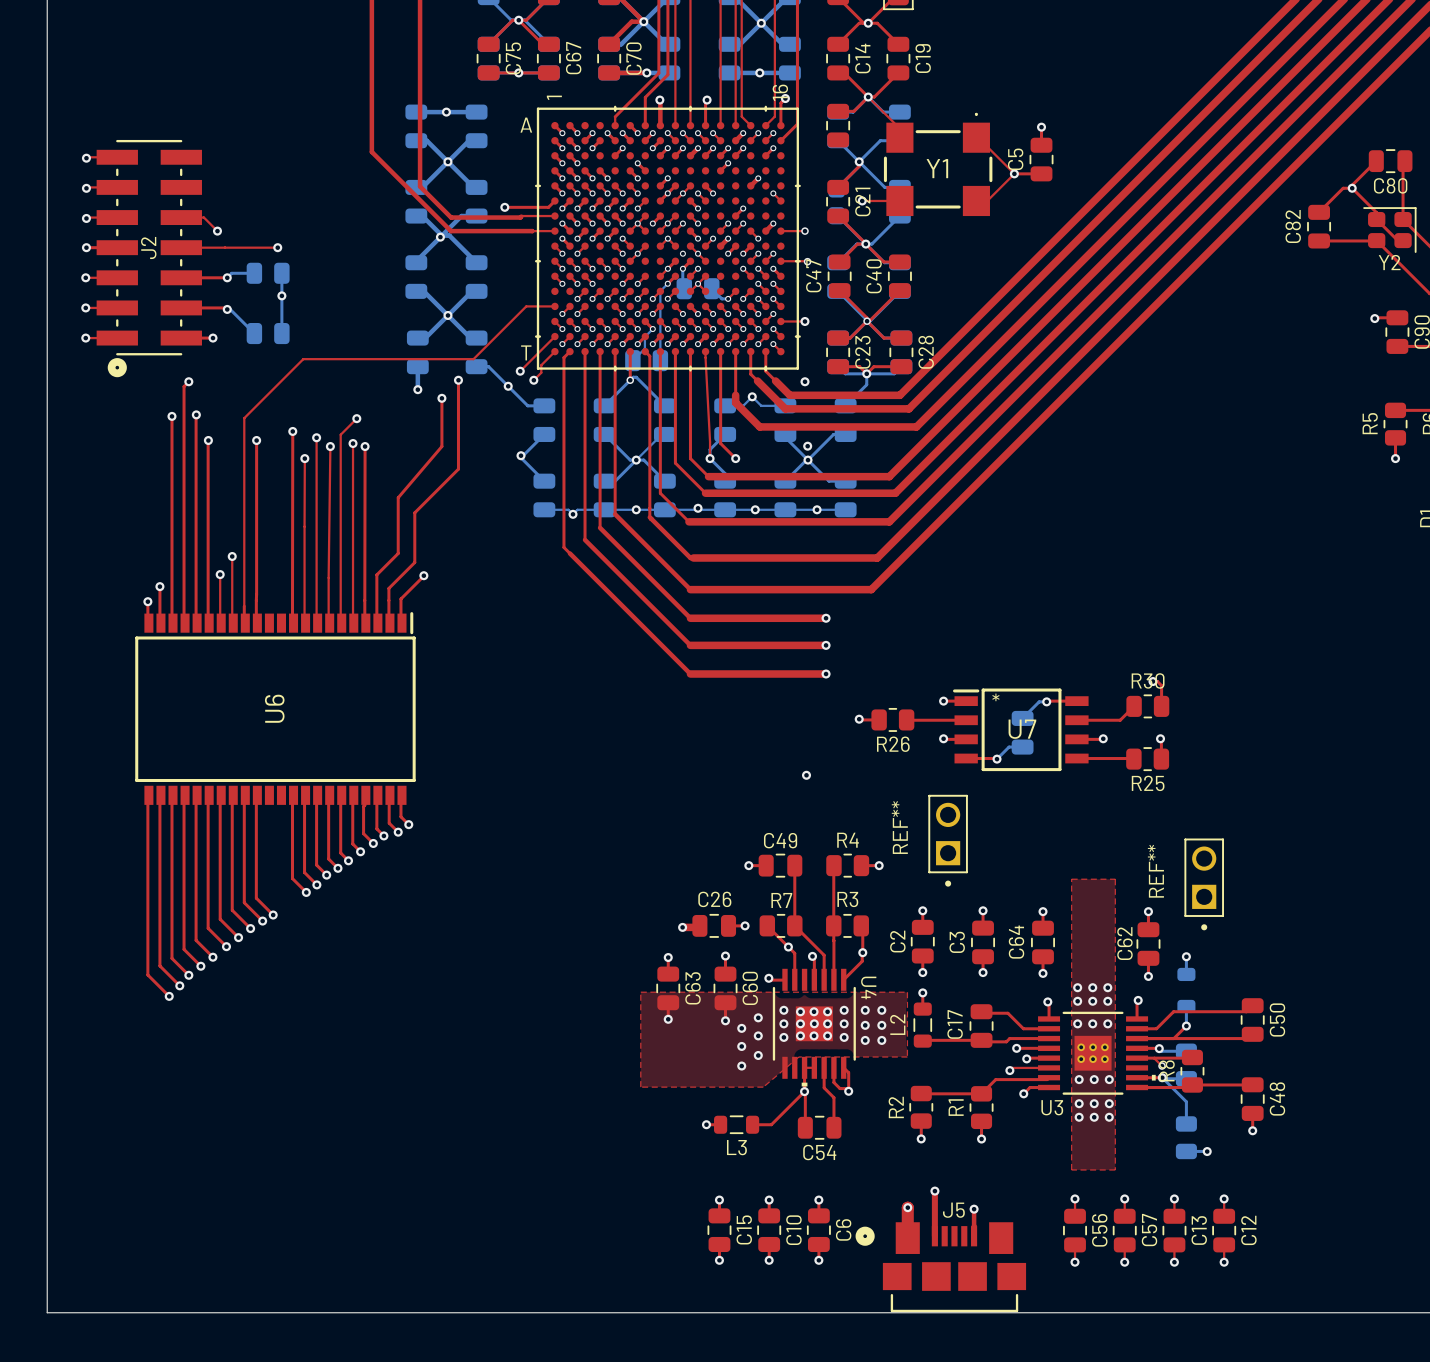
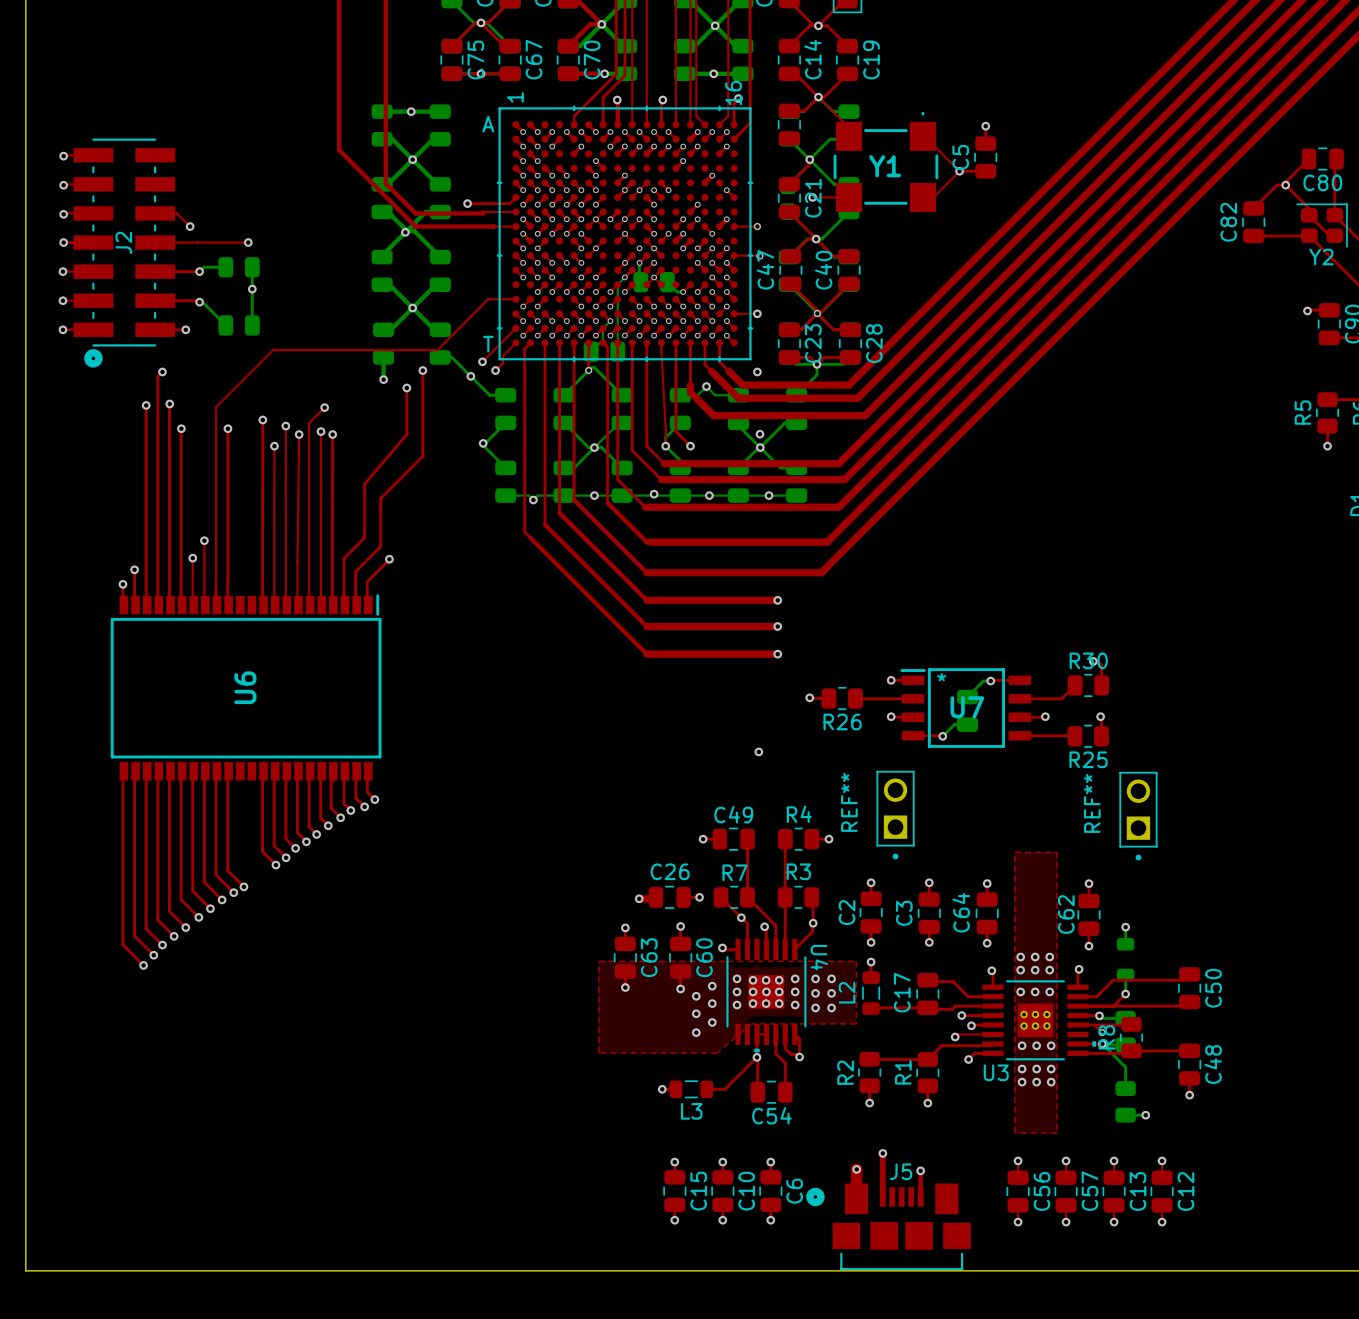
REF** position: (1204, 884) -> (1138, 816)

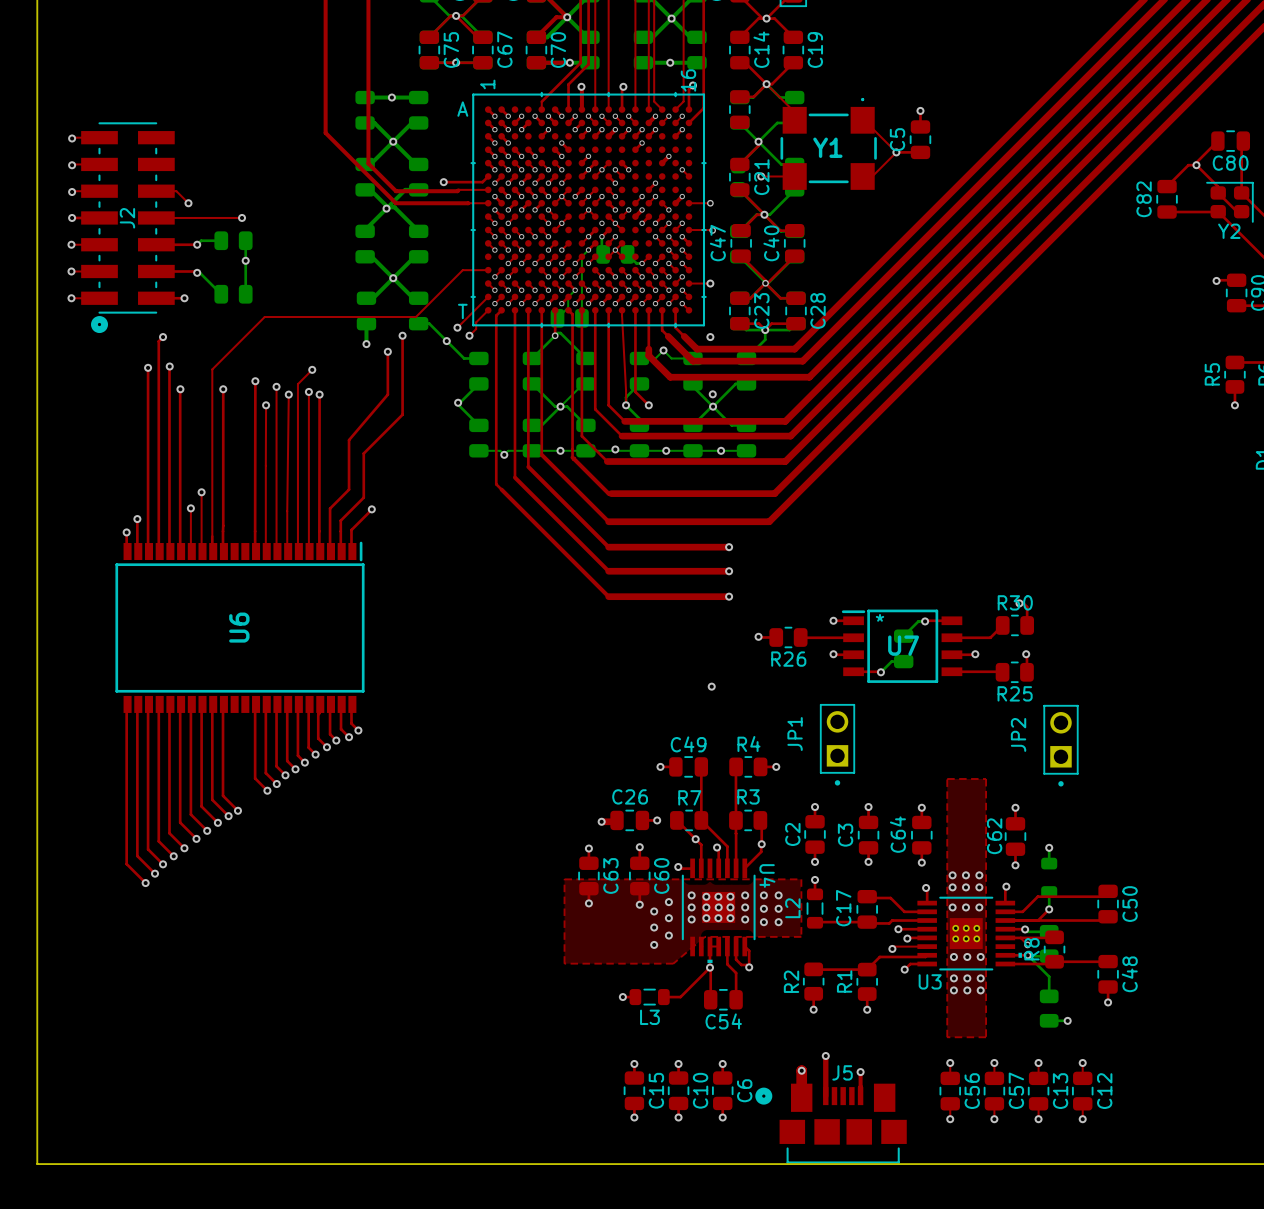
REF** name: REF** (849, 802) -> JP1 (795, 734)
REF** name: REF** (1092, 803) -> JP2 (1018, 734)

